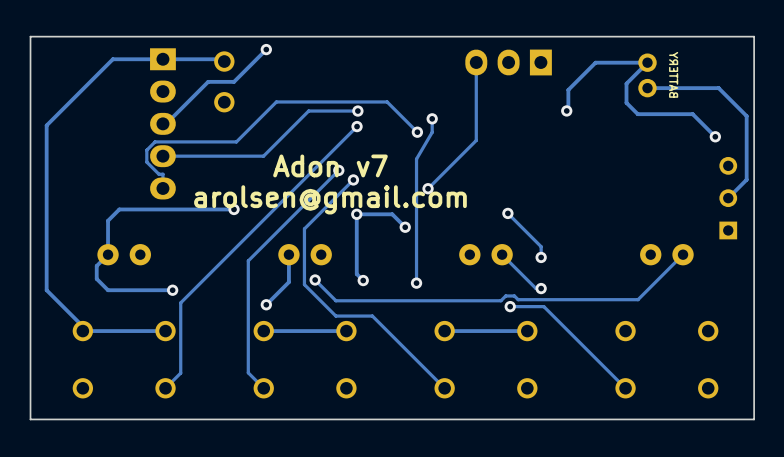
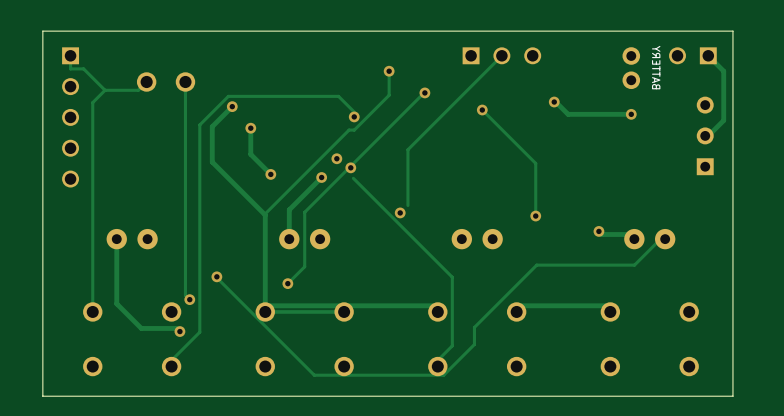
track: (266, 49) (234, 81) (208, 81) (166, 123) (162, 123) -> none
via: (266, 49) -> none
part footprint: [465, 49, 552, 76] -> [462, 47, 542, 65]
track: (224, 61) (222, 59) (112, 59) (46, 125) (46, 290) (82, 326) (82, 331) (165, 331) -> none
track: none -> (70, 55) (70, 68) (83, 68) (105, 90)
track: (476, 62) (476, 140) (428, 188) -> none
track: none -> (501, 55) (407, 149) (407, 205)
part: none -> (692, 55)
track: none -> (708, 55) (723, 71) (723, 120) (708, 135) (705, 135) (709, 135)
track: none -> (389, 71) (389, 95) (354, 130) (349, 130) (265, 215)
via: none -> (389, 71)
part rotation: 0° (224, 81) -> 90° clockwise (166, 81)
part position: (224, 81) -> (166, 81)
track: (647, 88) (718, 88) (746, 116) (746, 179) (728, 198) -> none
track: none -> (146, 81) (138, 90) (105, 90)
track: none -> (185, 81) (185, 295) (189, 299)
track: none -> (105, 90) (92, 102) (92, 305)
track: none -> (424, 92) (304, 212) (304, 266) (287, 283)
via: none -> (424, 92)
track: (566, 110) (568, 89) (595, 62) (647, 62) (626, 83) (626, 102) (637, 114) (692, 114) (715, 136) -> none
track: (357, 111) (308, 111) (263, 156) (162, 156) -> none
via: (357, 111) -> none
track: none -> (558, 105) (568, 114) (631, 114)
track: none -> (232, 106) (212, 126) (212, 162) (265, 215)
via: none -> (232, 106)
track: (432, 118) (432, 132) (416, 159) (416, 283) -> none
via: (432, 118) -> none
track: none -> (482, 110) (535, 163) (535, 216)
via: none -> (482, 110)
part: (162, 123) -> none
track: none -> (355, 113) (338, 96) (228, 96) (199, 124) (199, 332) (171, 360)
track: (357, 126) (180, 302) (180, 373) (165, 388) -> none
part: none -> (70, 117)
track: (417, 132) (387, 101) (276, 101) (236, 141) (155, 141) (146, 150) (146, 162) (158, 174) (162, 174) (162, 188) -> none
via: (417, 132) -> none
via position: (715, 136) -> (631, 114)
track: none -> (250, 128) (250, 154) (270, 174)
via: none -> (250, 128)
text: Adon v7 (330, 165) -> none
track: (338, 170) (248, 260) (248, 372) (263, 388) -> none
track: (353, 179) (304, 228) (304, 284) (335, 316) (372, 316) (444, 388) -> none
via: none -> (270, 174)
via: (428, 188) -> none
track: none -> (321, 177) (289, 209) (289, 234)
track: none -> (353, 178) (452, 277) (452, 345) (437, 360)
part position: (728, 198) -> (705, 135)
text: arolsen@gmail.com (330, 199) -> none
track: (234, 209) (119, 209) (108, 220) (108, 249) -> none
via: (234, 209) -> none
track: (507, 213) (541, 246) (541, 257) -> none
via: (507, 213) -> none
via position: (356, 214) -> (321, 177)
track: (405, 227) (392, 214) (356, 214) (356, 274) (363, 280) -> none
track: none -> (265, 215) (265, 305) (437, 305)
via: none -> (535, 216)
track: none -> (598, 231) (602, 234) (634, 234)
via: none -> (598, 231)
track: none -> (665, 234) (634, 265) (536, 265) (474, 327) (474, 344) (443, 375) (314, 375) (216, 276)
track: (108, 254) (96, 266) (96, 278) (108, 290) (172, 290) -> (116, 239) (116, 303) (141, 328) (176, 328) (179, 331)
track: (288, 254) (288, 282) (266, 304) -> none
track: (502, 254) (535, 288) (541, 288) -> none
track: (683, 254) (638, 299) (518, 299) (514, 295) (505, 295) (500, 300) (335, 300) (315, 279) -> none
via: (541, 257) -> none
via: (315, 279) -> none
via: (363, 280) -> none
via: (416, 283) -> none
via: (541, 288) -> none
via: (172, 290) -> none
via: none -> (216, 276)
via: none -> (287, 283)
via: (266, 304) -> none
track: (510, 306) (543, 306) (625, 388) -> none
via: (510, 306) -> none
via: none -> (189, 299)
track: none -> (610, 305) (516, 305)
track: (527, 331) (444, 331) -> none
via: none -> (179, 331)

